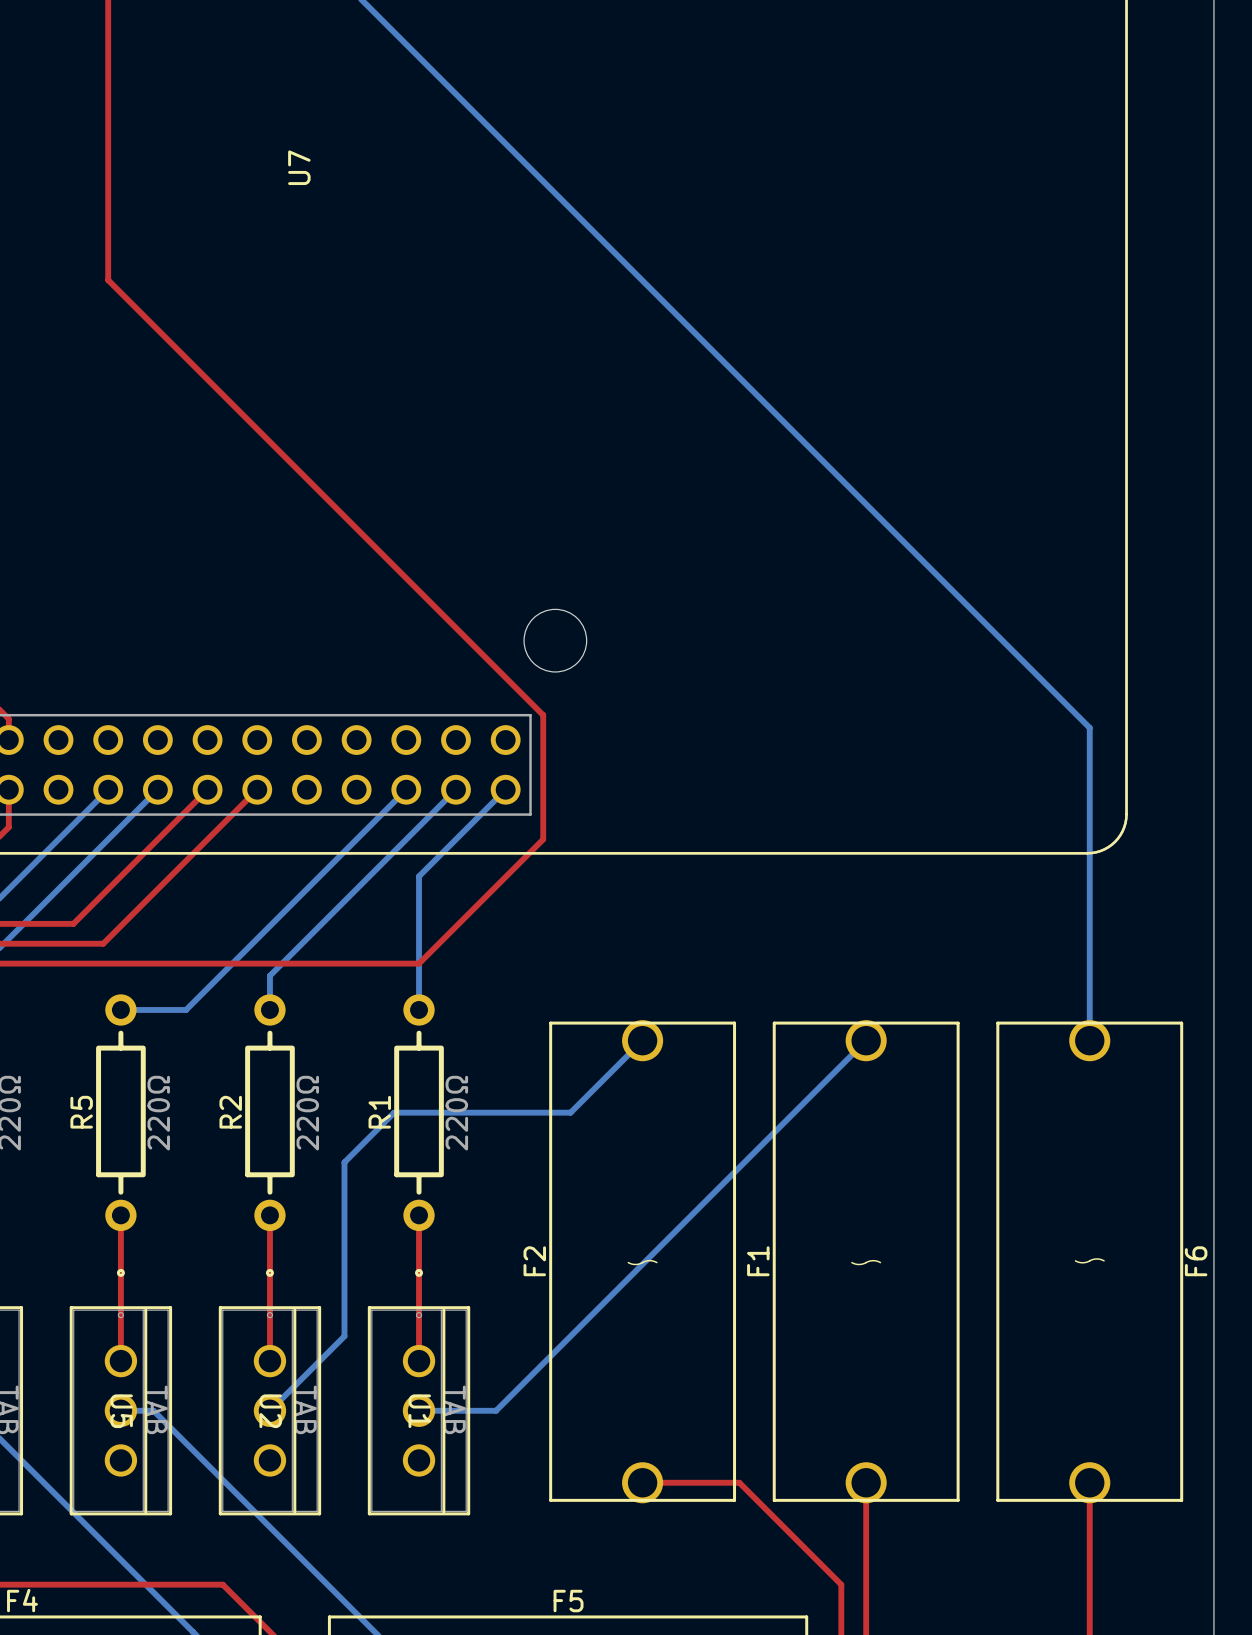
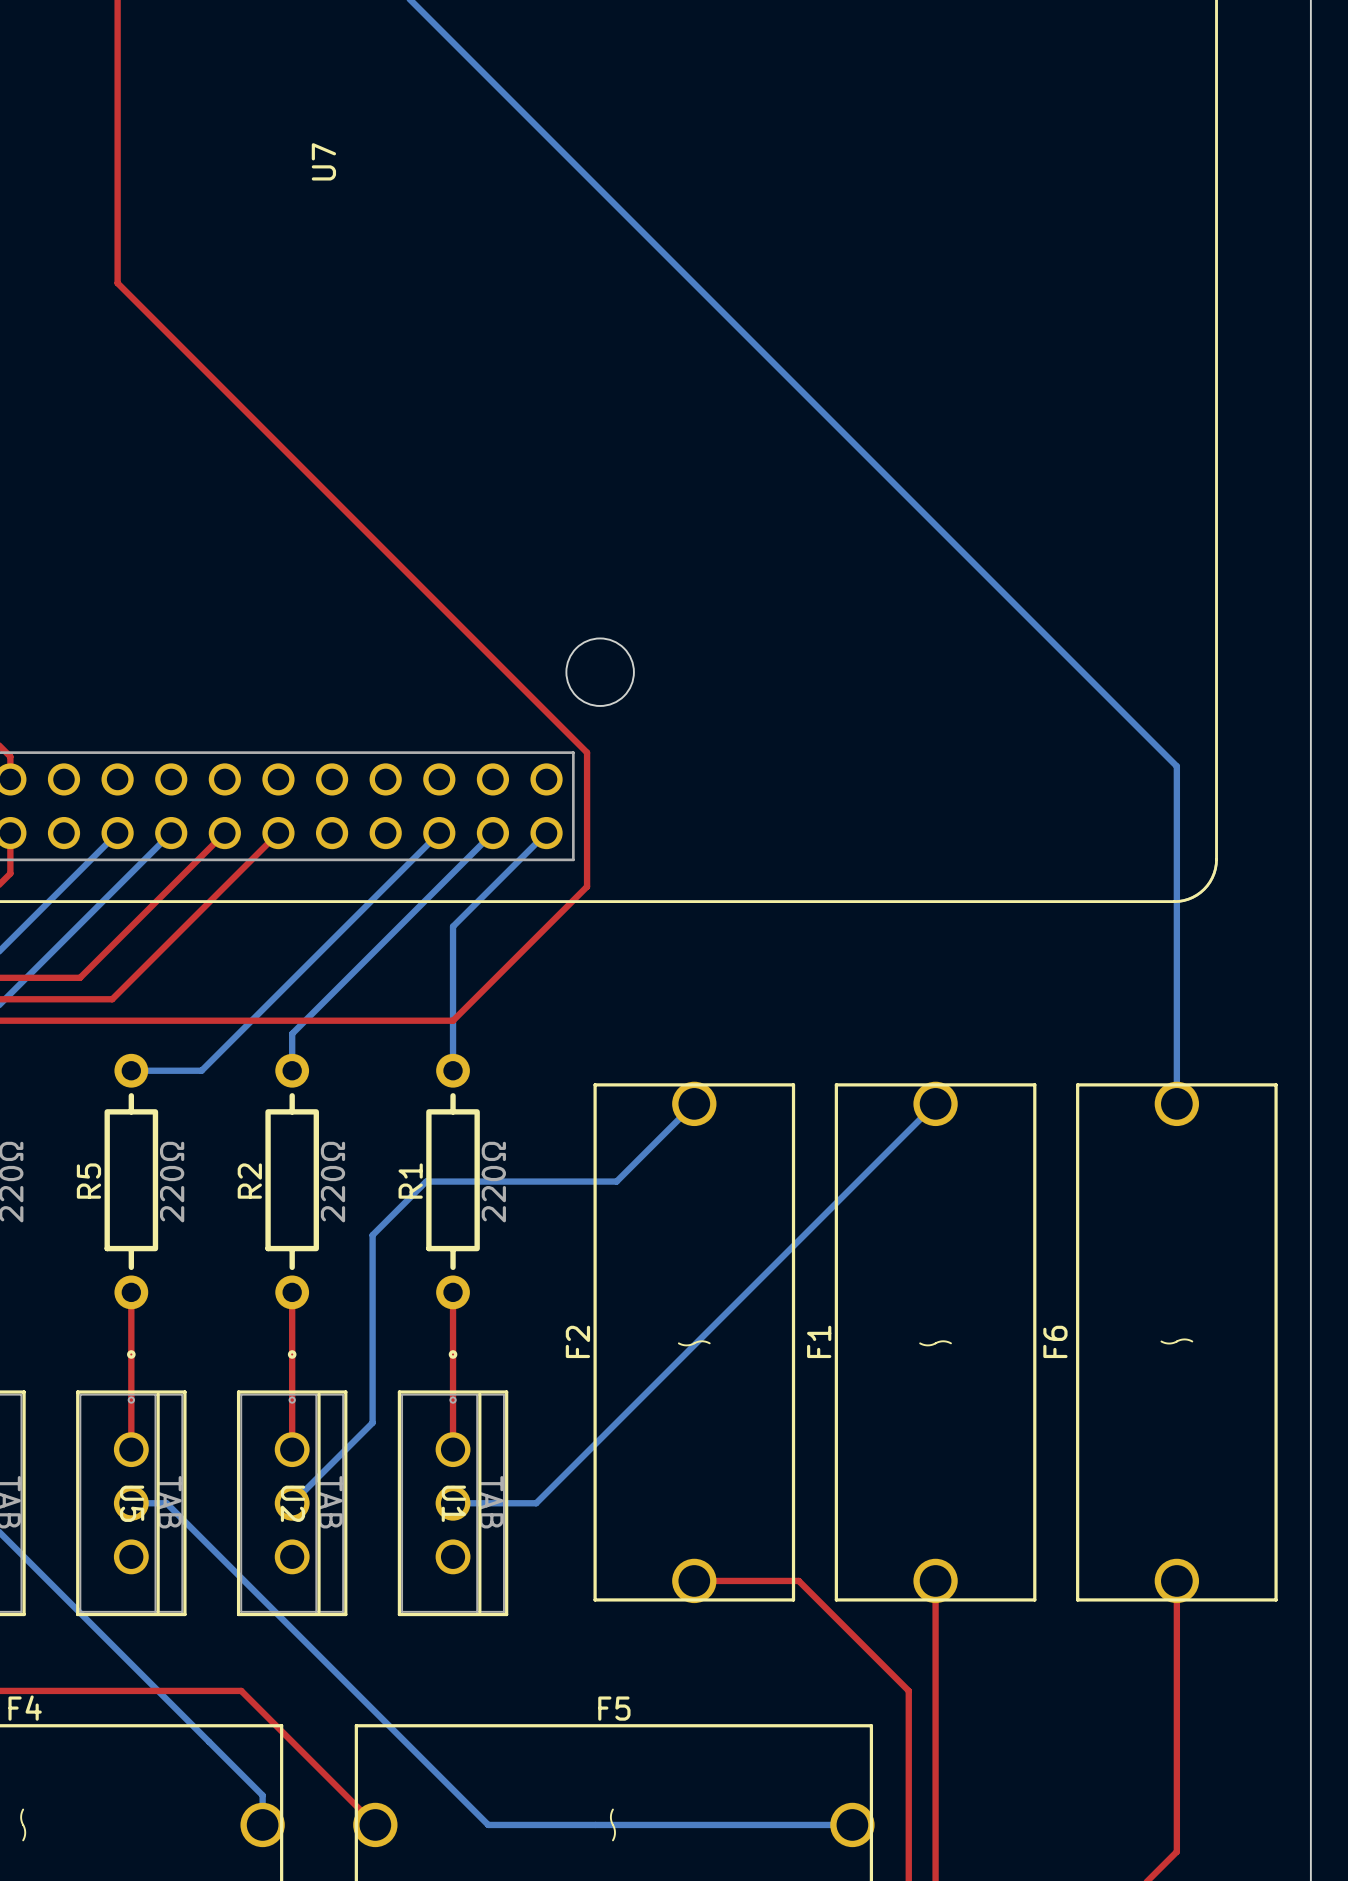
F6 name position: F6 (1196, 1261) -> F6 (1055, 1341)

